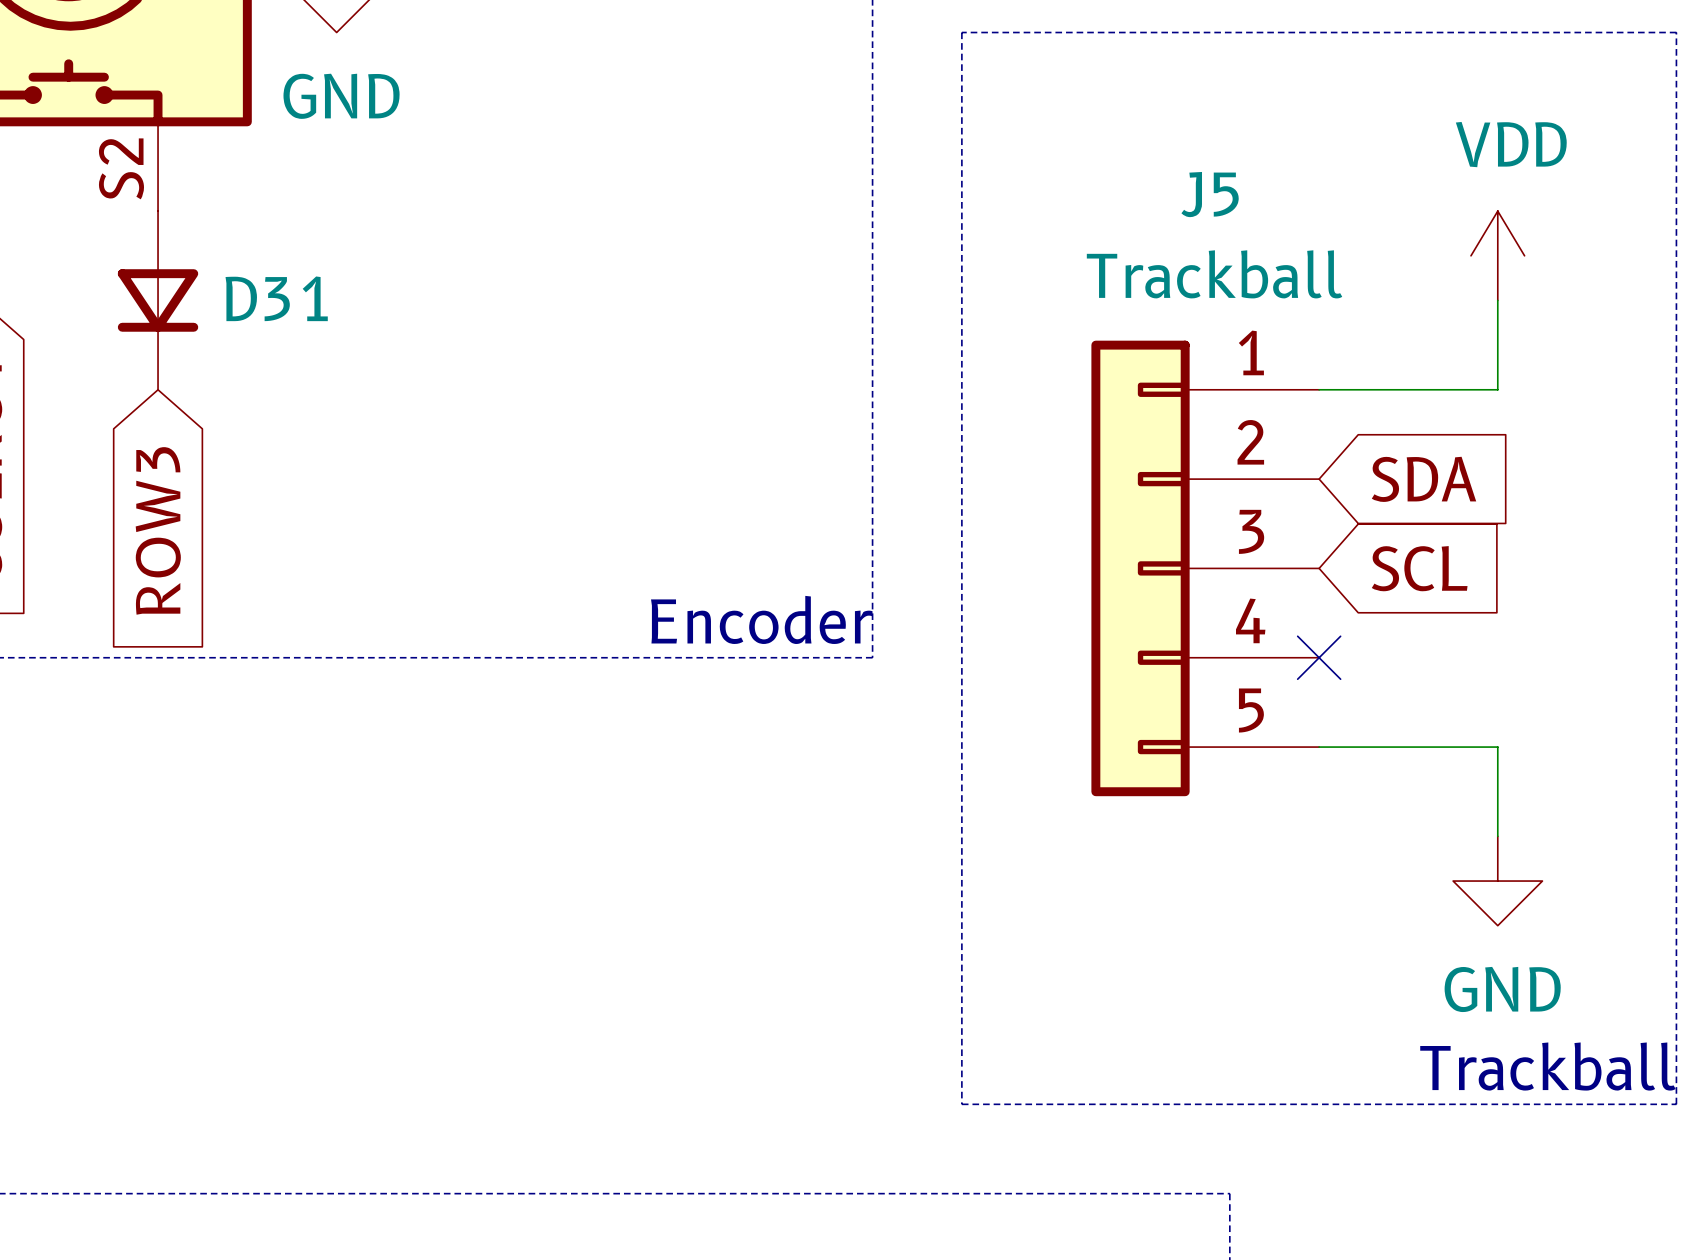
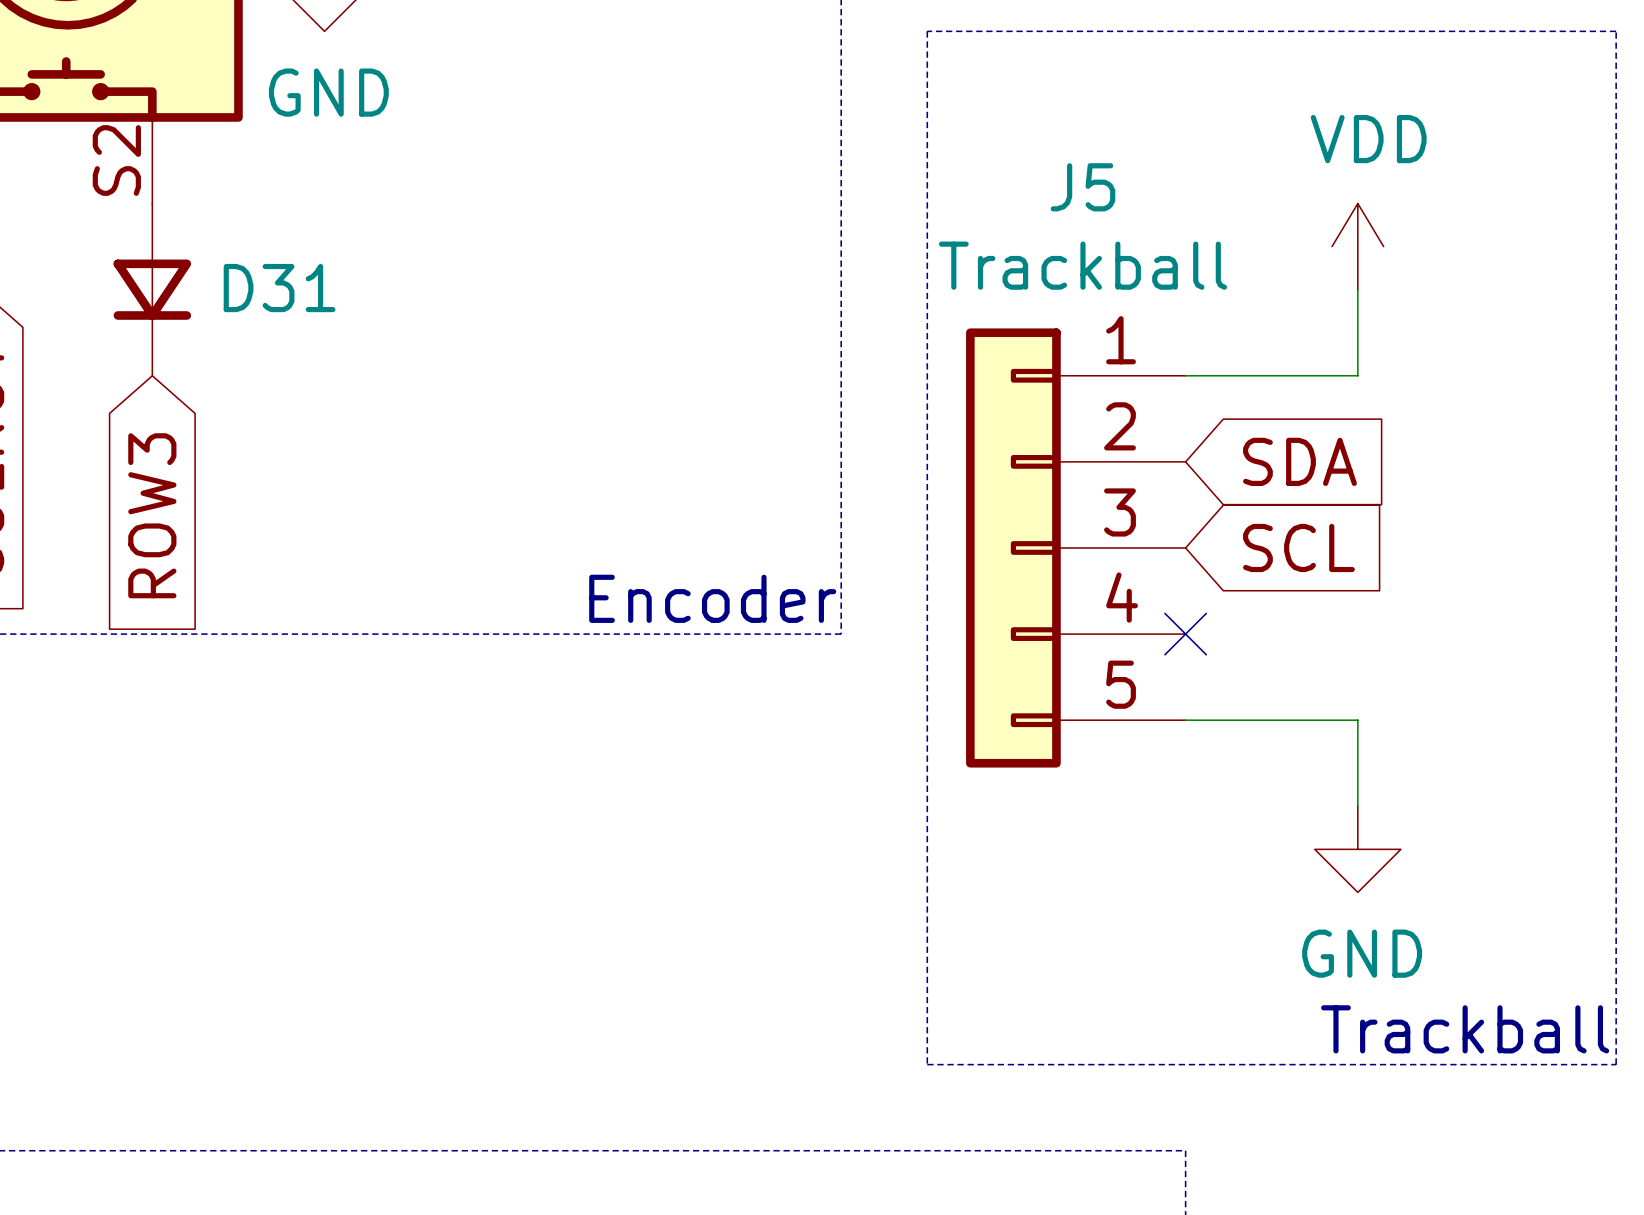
power symbol position: VDD (1497, 255) -> VDD (1357, 246)
wire: (1497, 300) (1497, 389) (1408, 389) -> (1357, 289) (1357, 375)
global label position: SDA (1424, 479) -> SDA (1299, 461)
J5 position: (1205, 568) -> (1075, 547)
global label position: SCL (1419, 568) -> SCL (1298, 547)
no-connect mark position: (1319, 657) -> (1185, 634)
wire: (1408, 747) (1497, 747) (1497, 836) -> (1357, 720) (1357, 806)
power symbol position: GND (1497, 881) -> GND (1357, 849)

